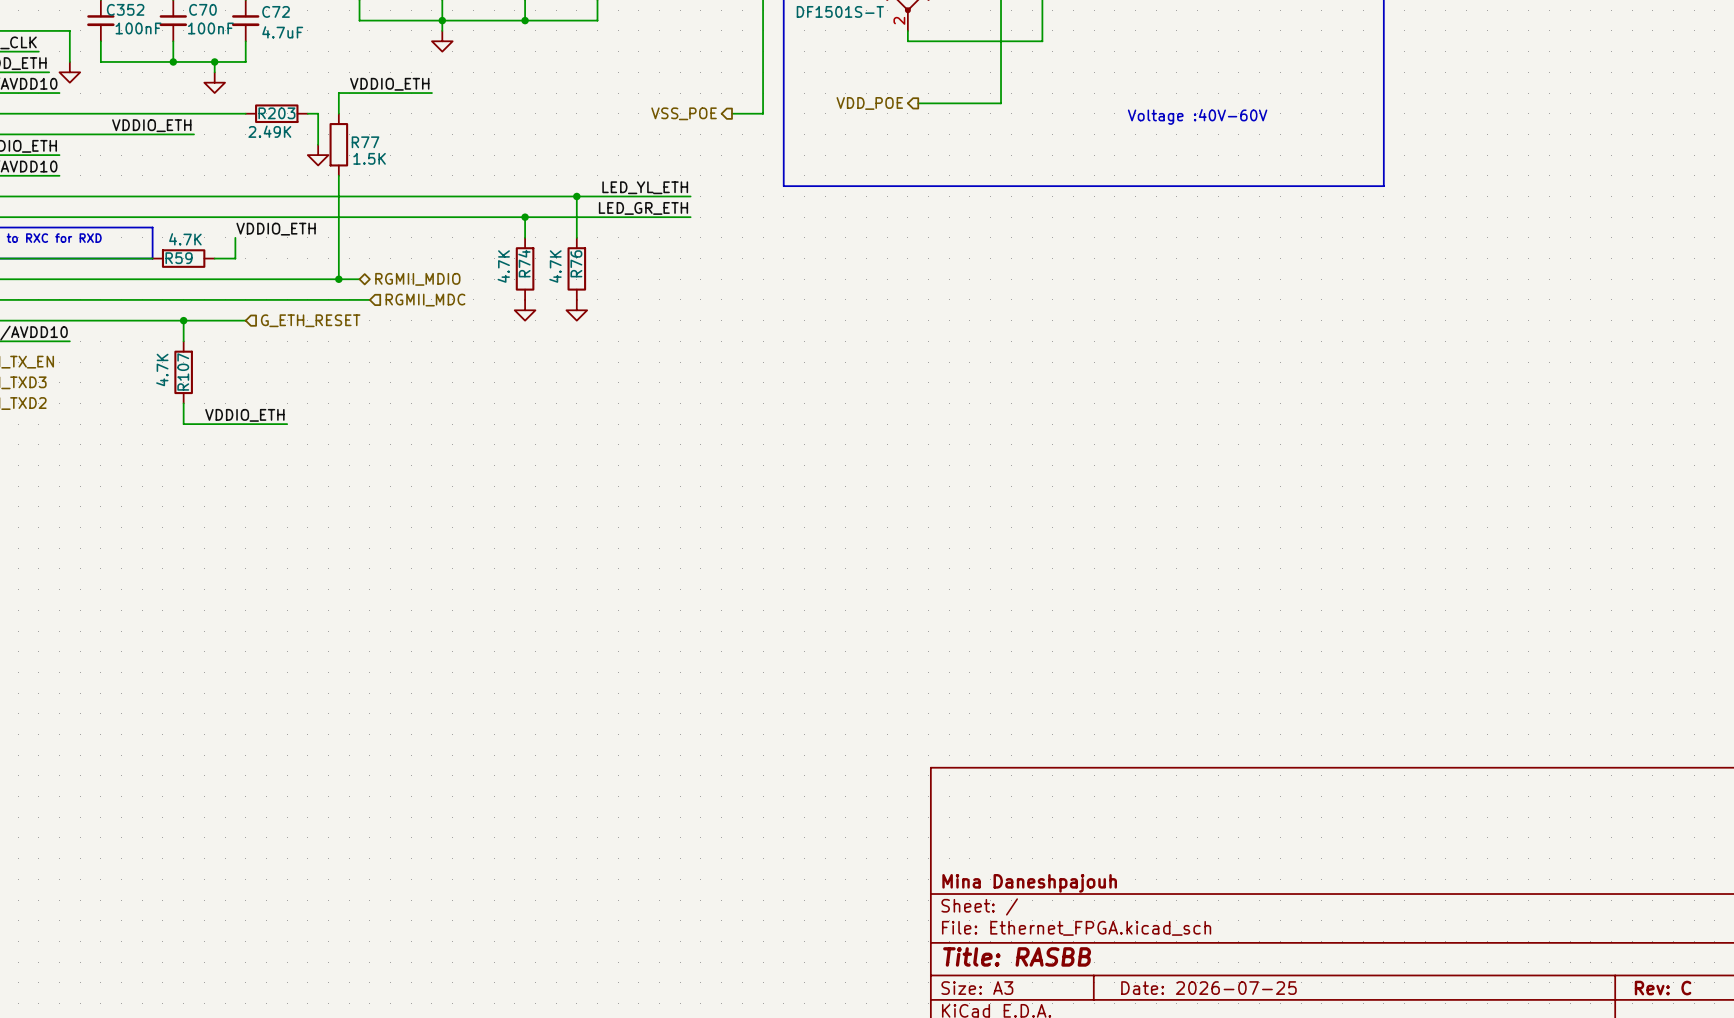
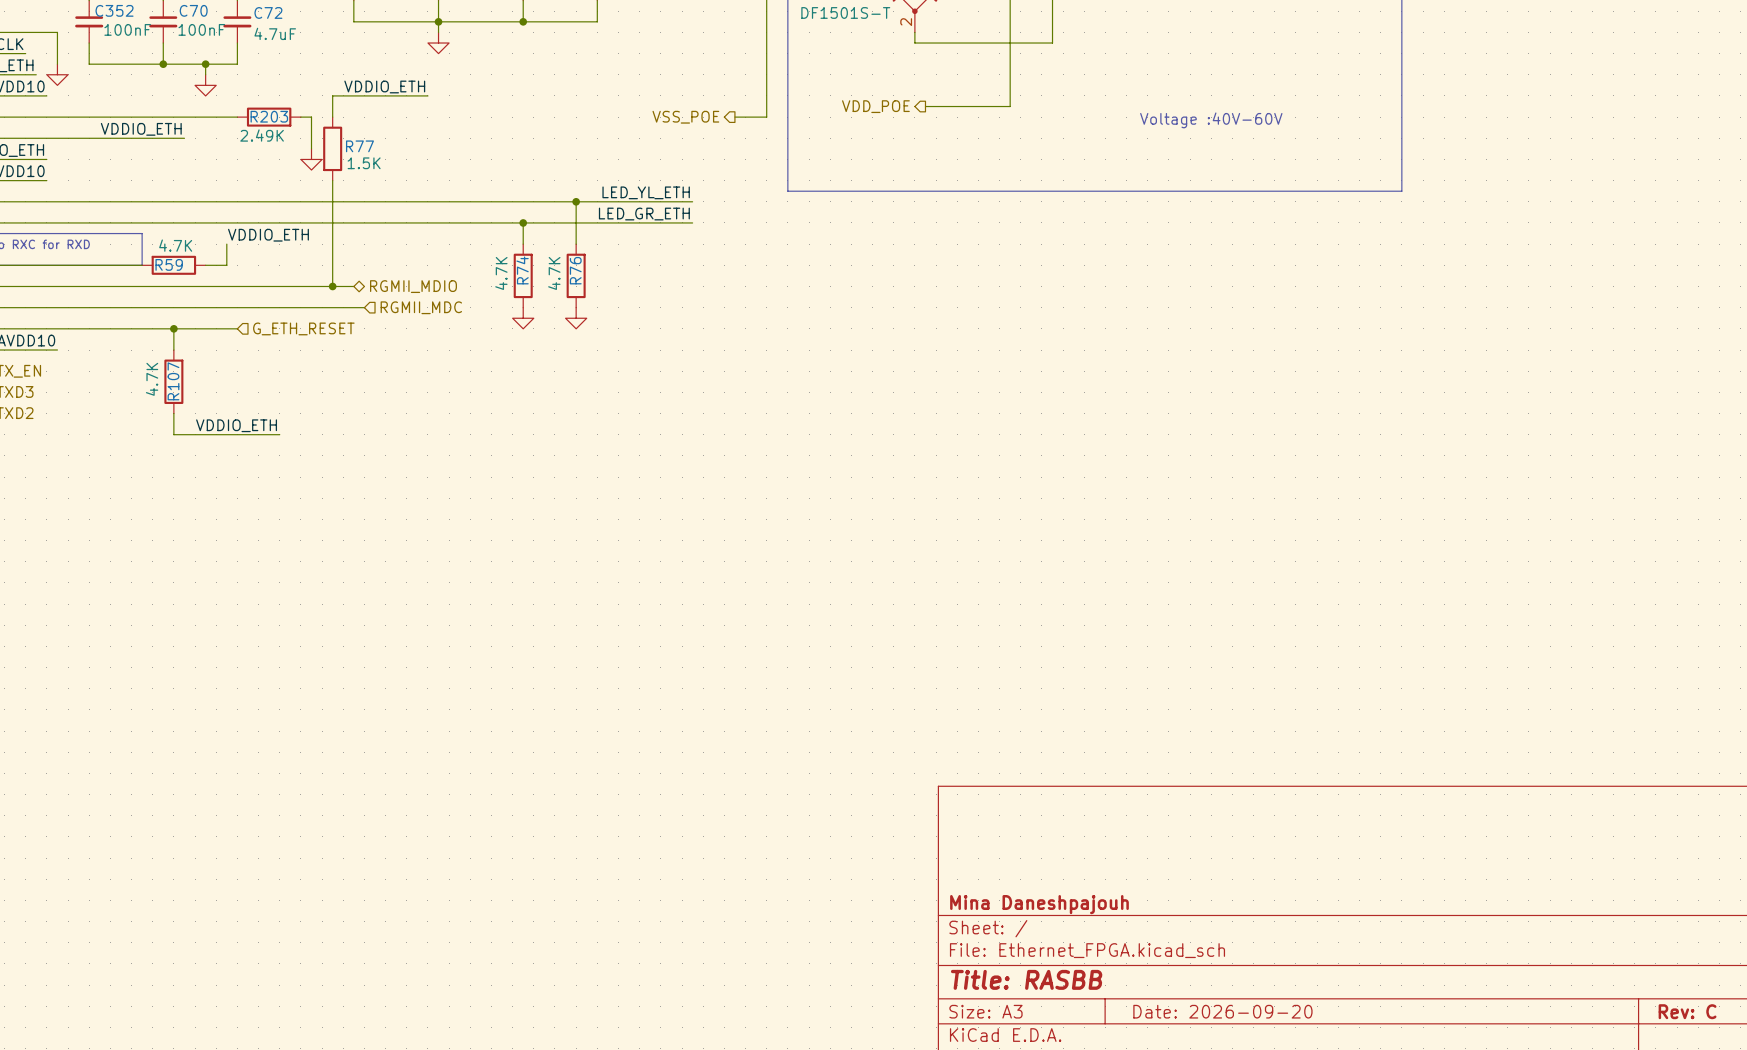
title block: Date: 2026-07-25 (1208, 988) -> Date: 2026-09-20 (1222, 1011)

